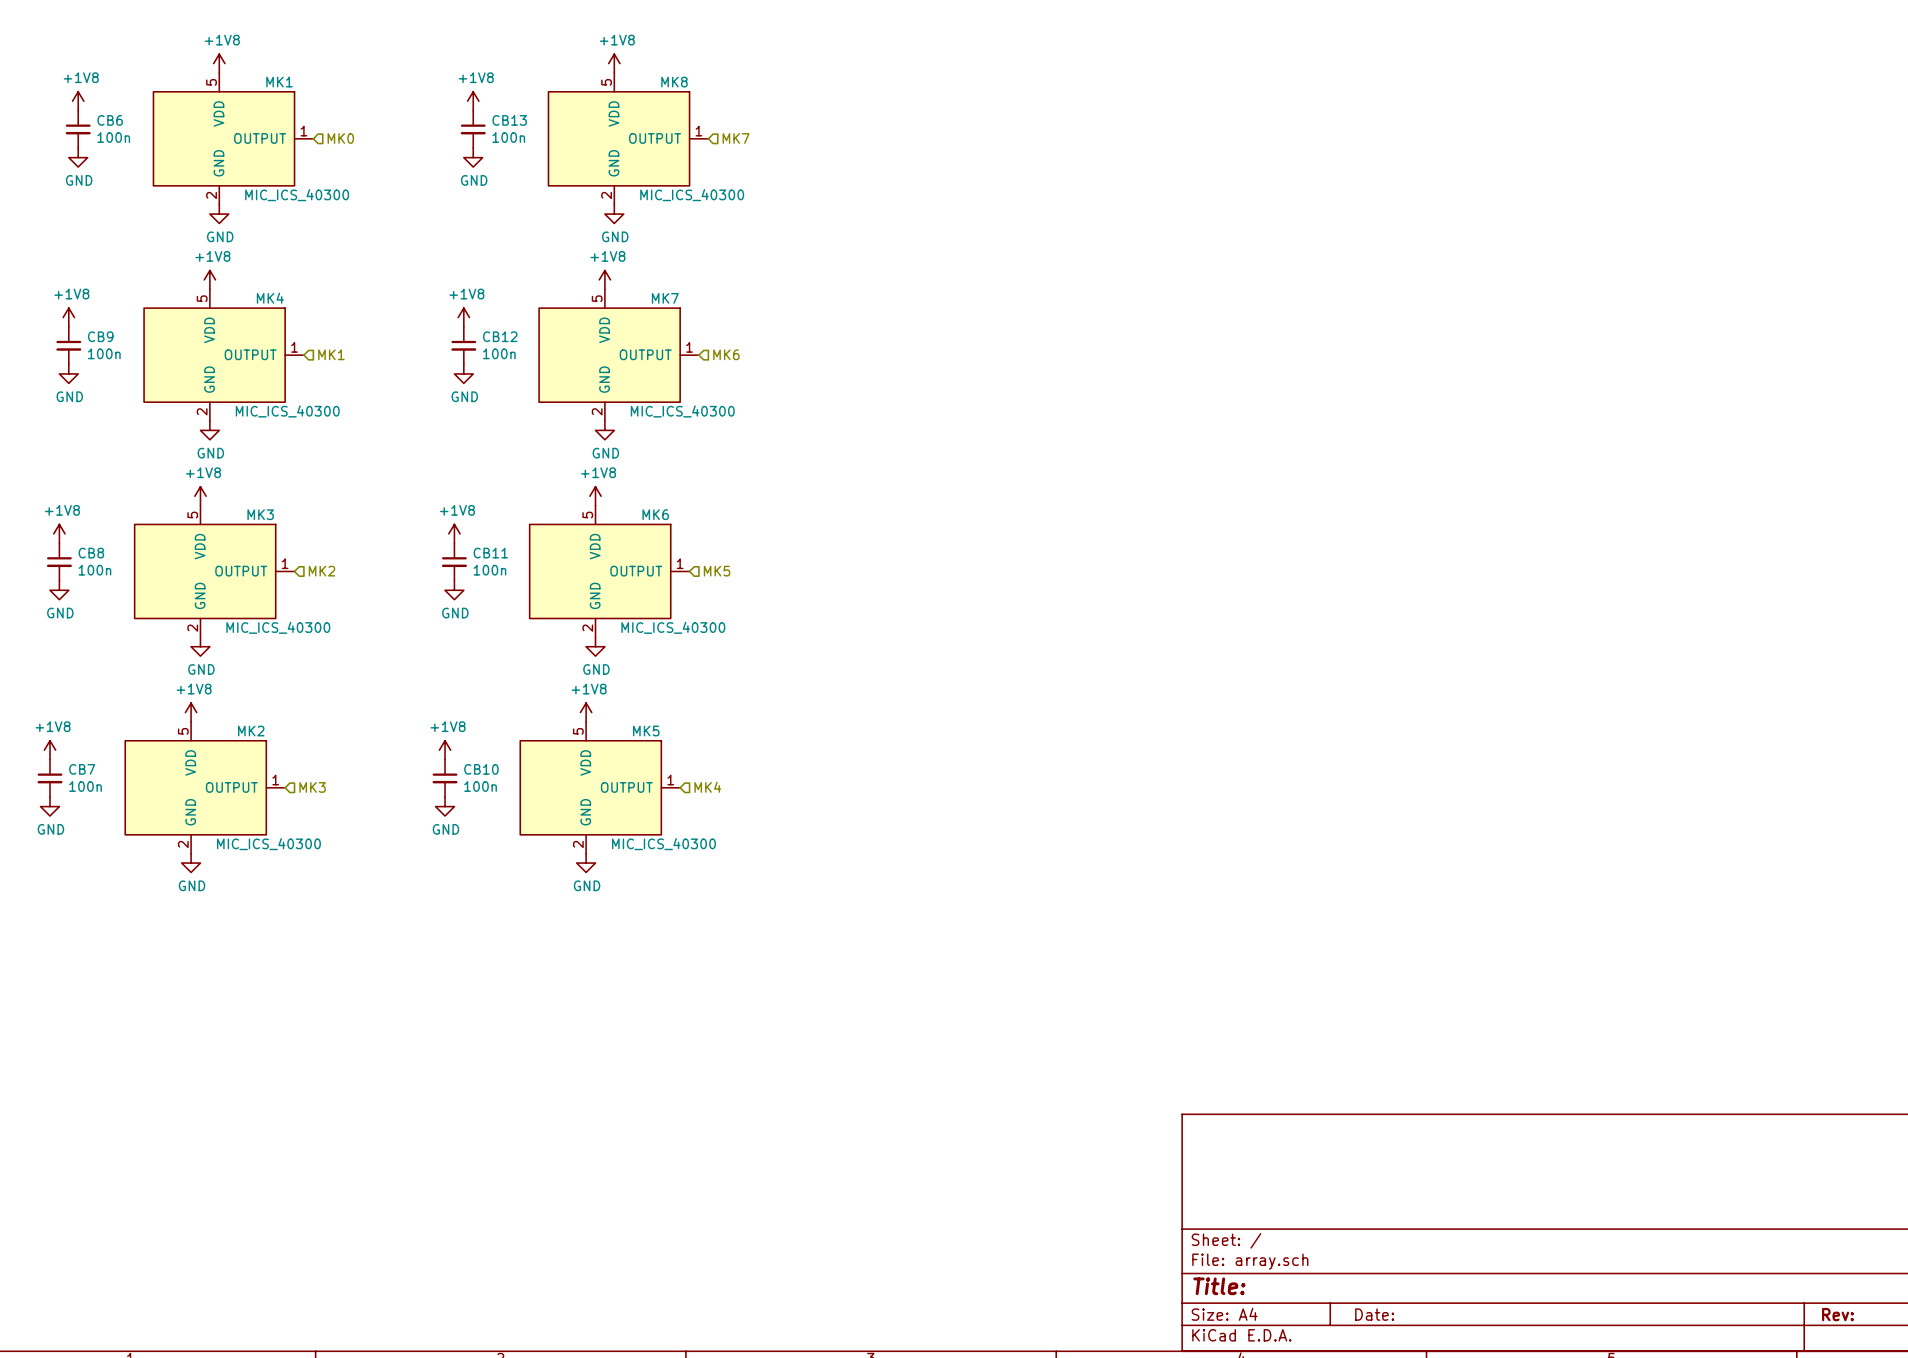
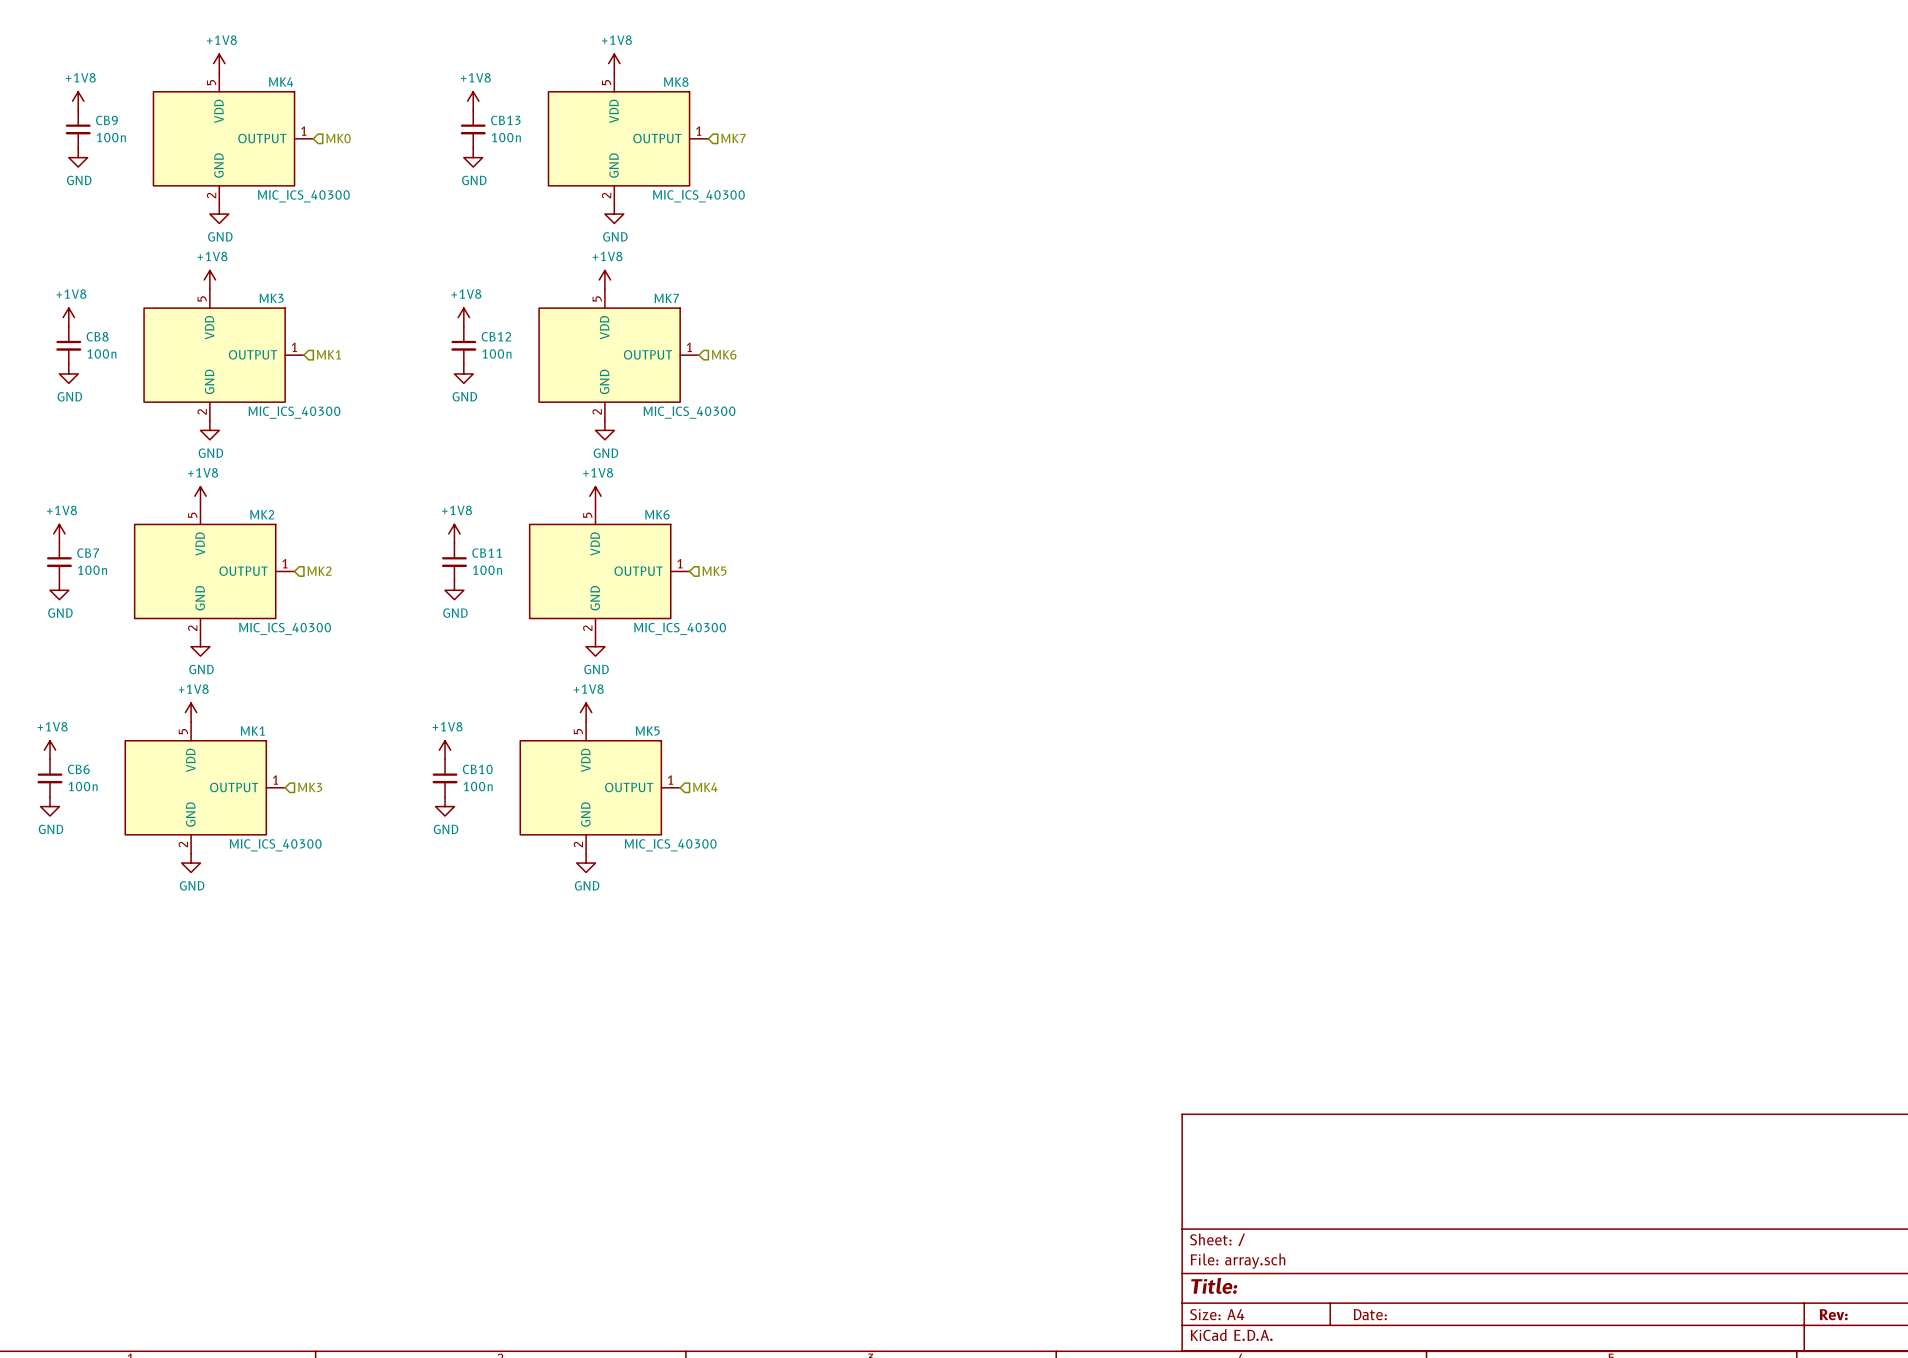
MK1 name: MK1 (279, 82) -> MK4 (281, 82)
CB6 name: CB6 (110, 120) -> CB9 (107, 120)
MK4 name: MK4 (270, 298) -> MK3 (271, 298)
CB9 name: CB9 (100, 336) -> CB8 (97, 336)
MK3 name: MK3 (260, 514) -> MK2 (262, 514)
CB8 name: CB8 (91, 553) -> CB7 (88, 553)
MK2 name: MK2 (251, 731) -> MK1 (252, 731)
CB7 name: CB7 (82, 769) -> CB6 (78, 769)

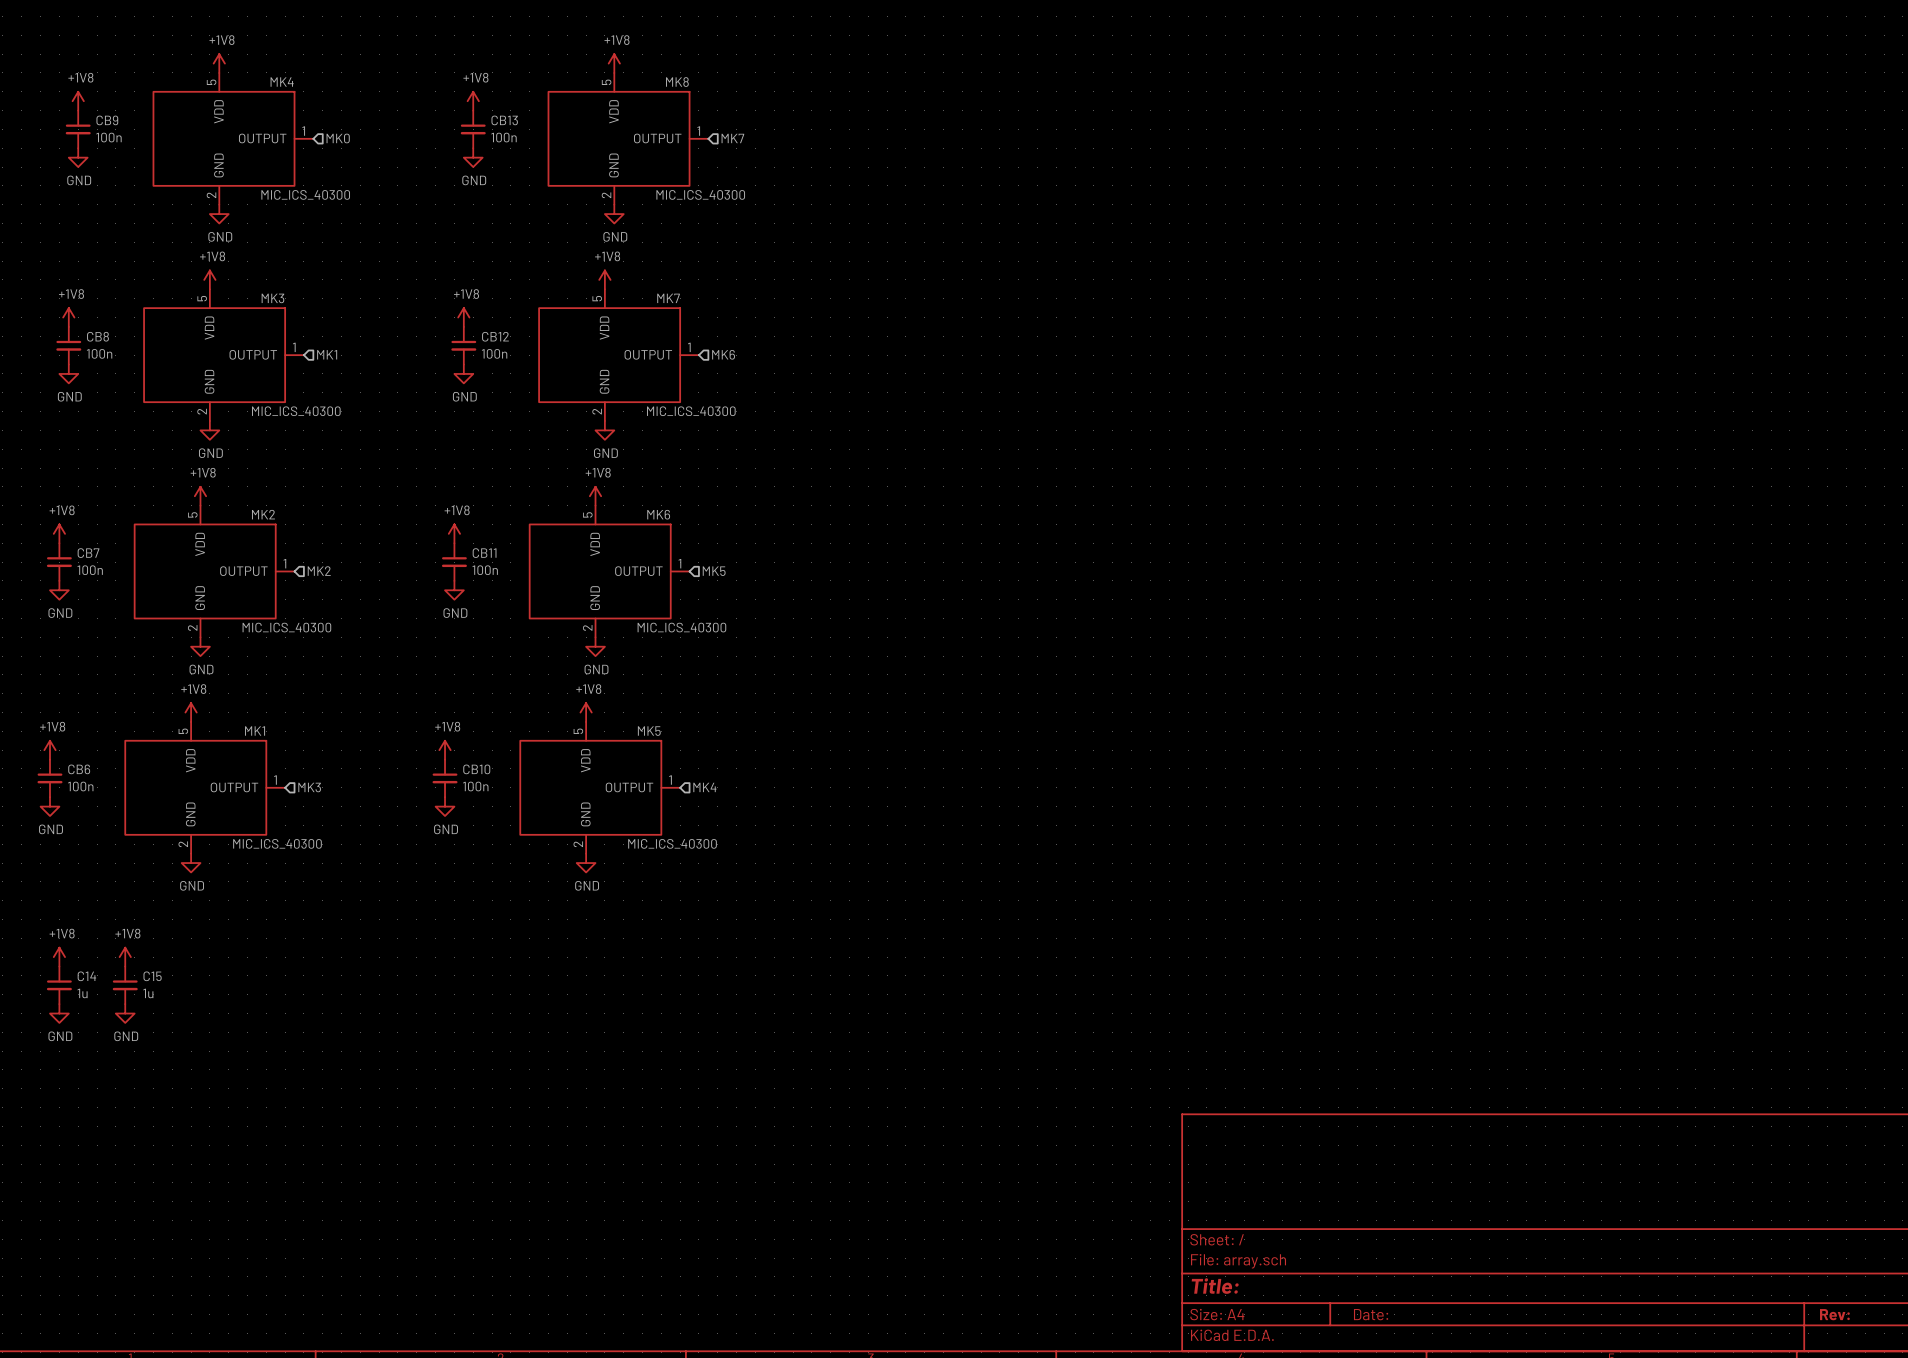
power symbol: none -> +1V8 (59, 957)
power symbol: none -> +1V8 (125, 957)
C14: none -> 1u (59, 985)
C15: none -> 1u (125, 985)
power symbol: none -> GND (59, 1013)
power symbol: none -> GND (125, 1013)

